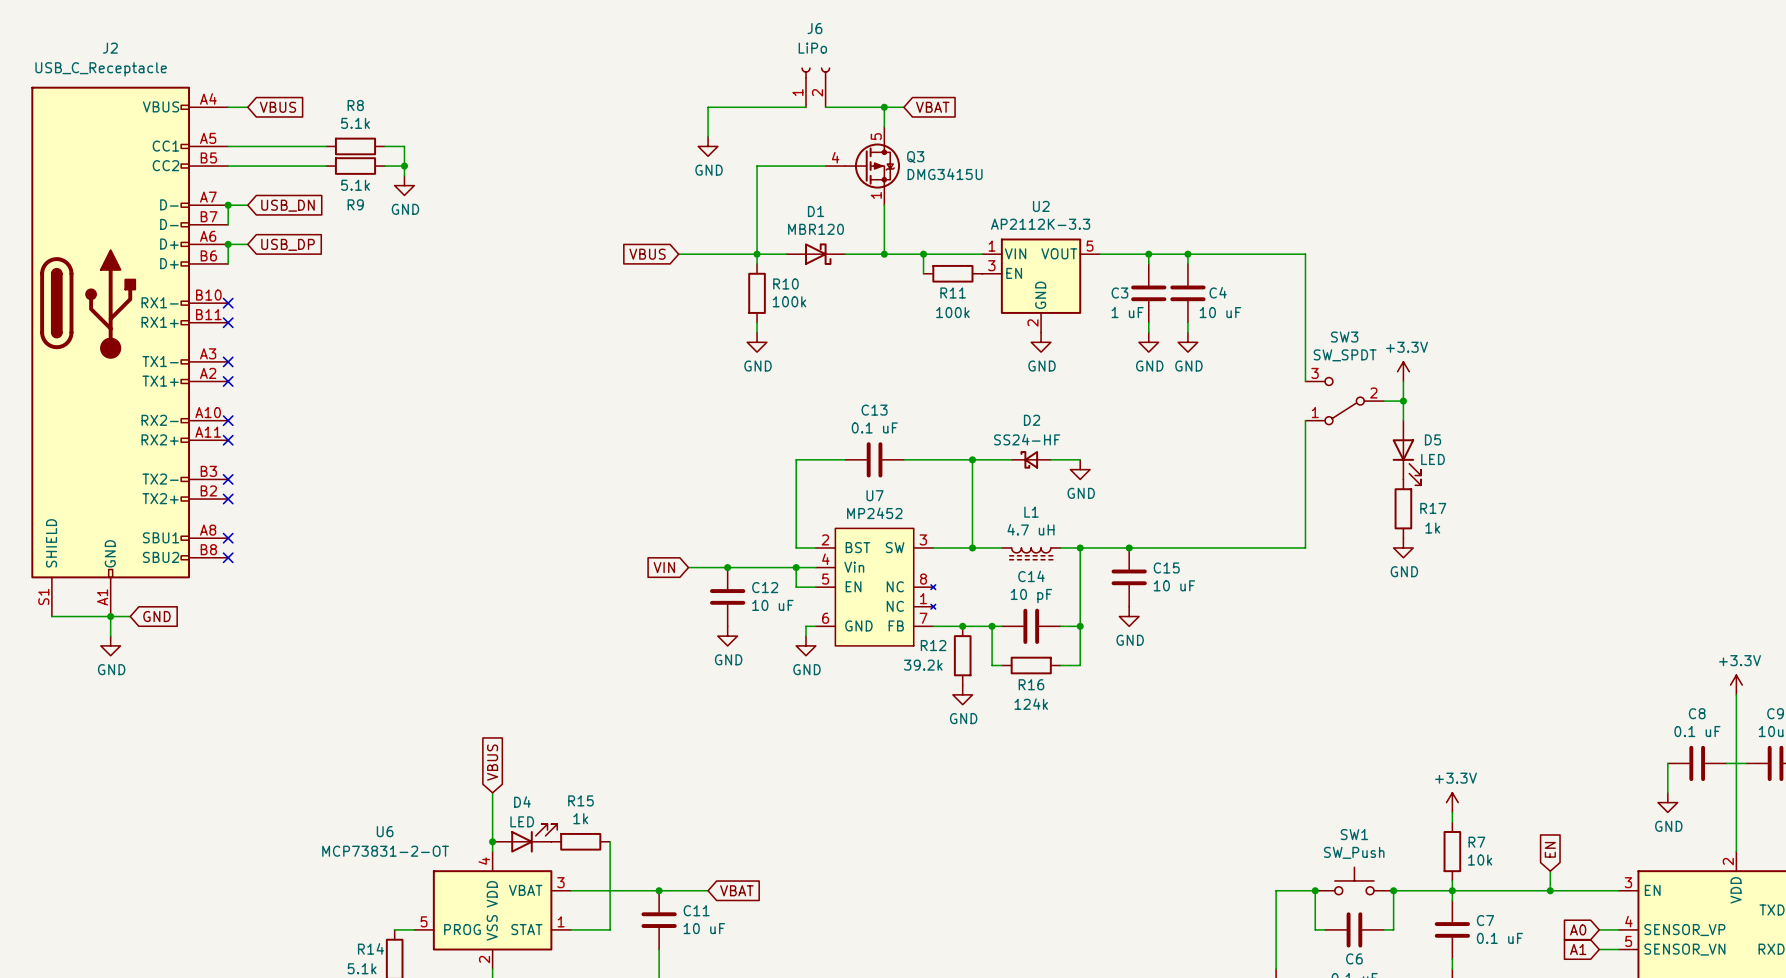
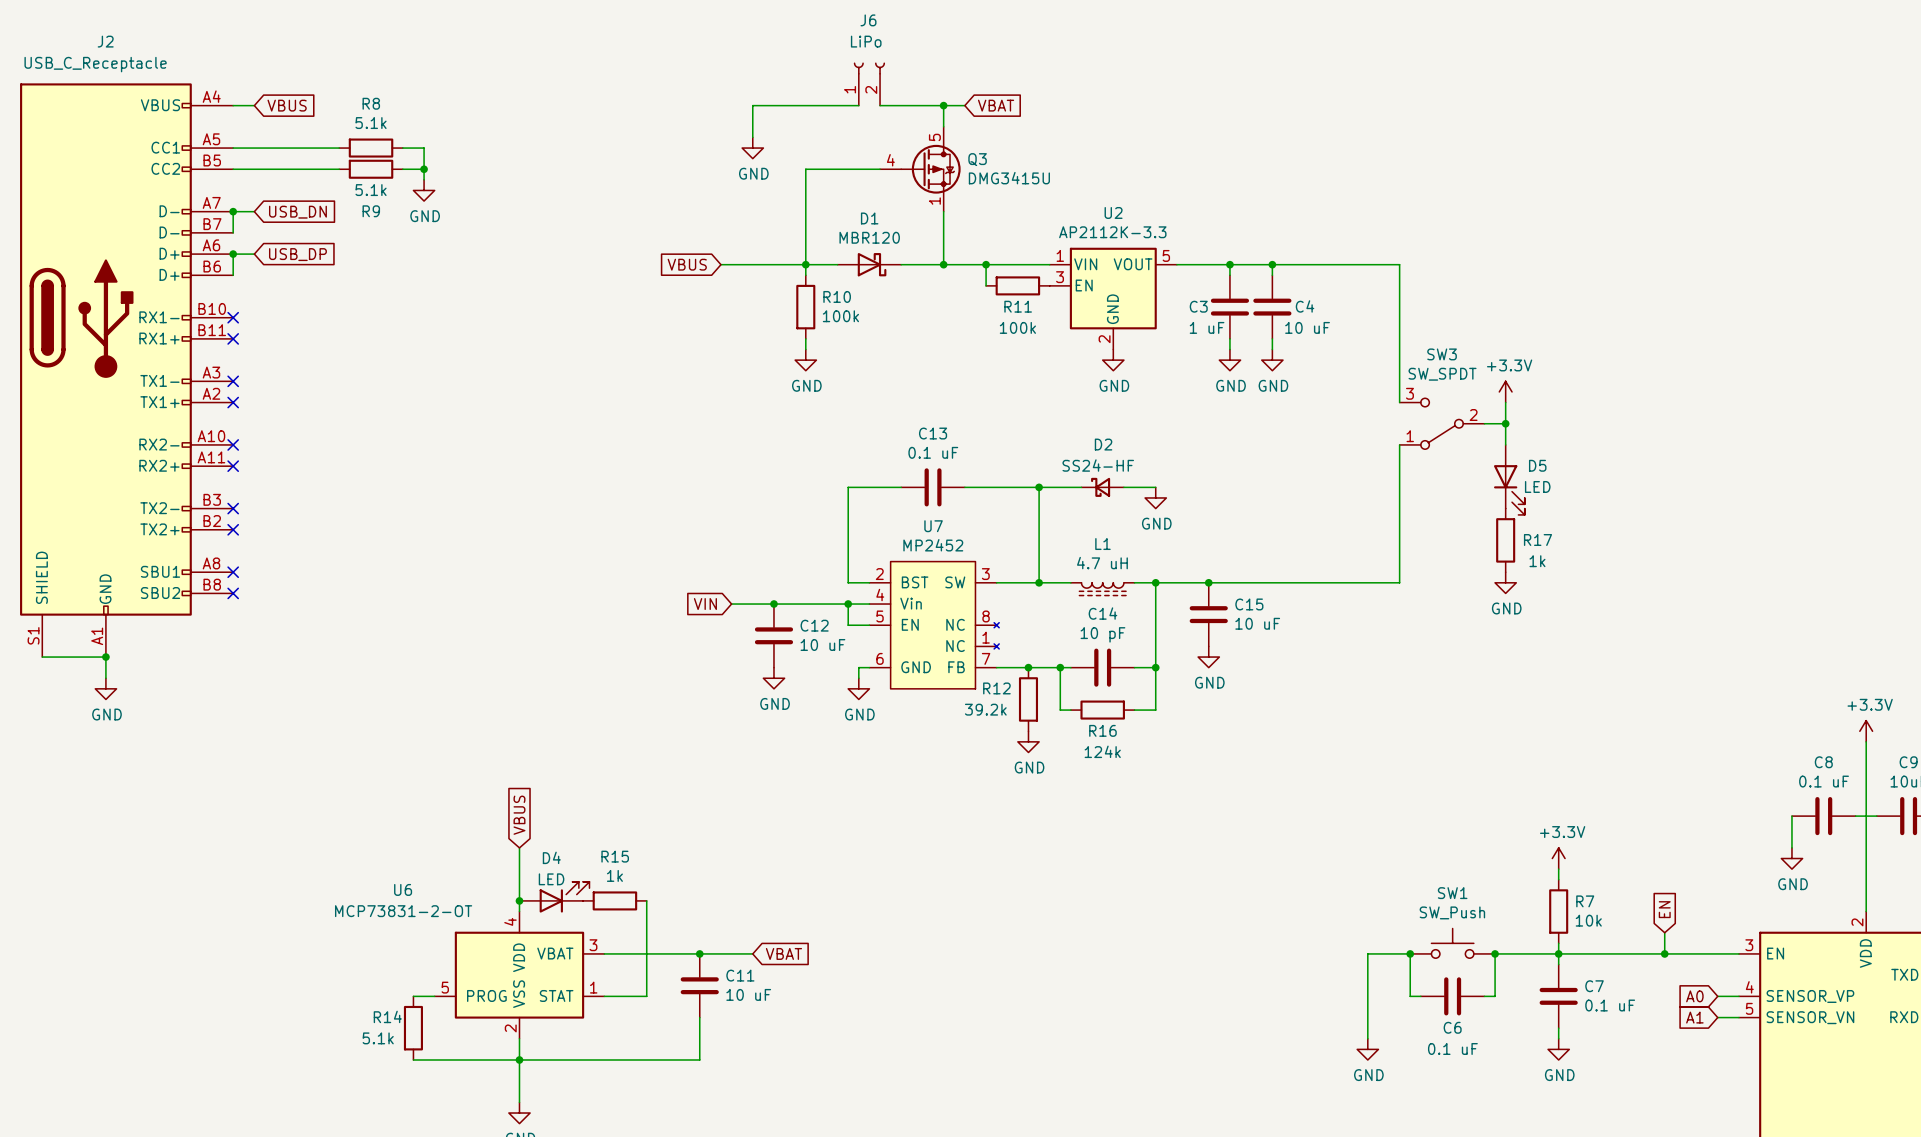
wire: (110, 616) (130, 616) -> none
global label: GND (156, 616) -> none

